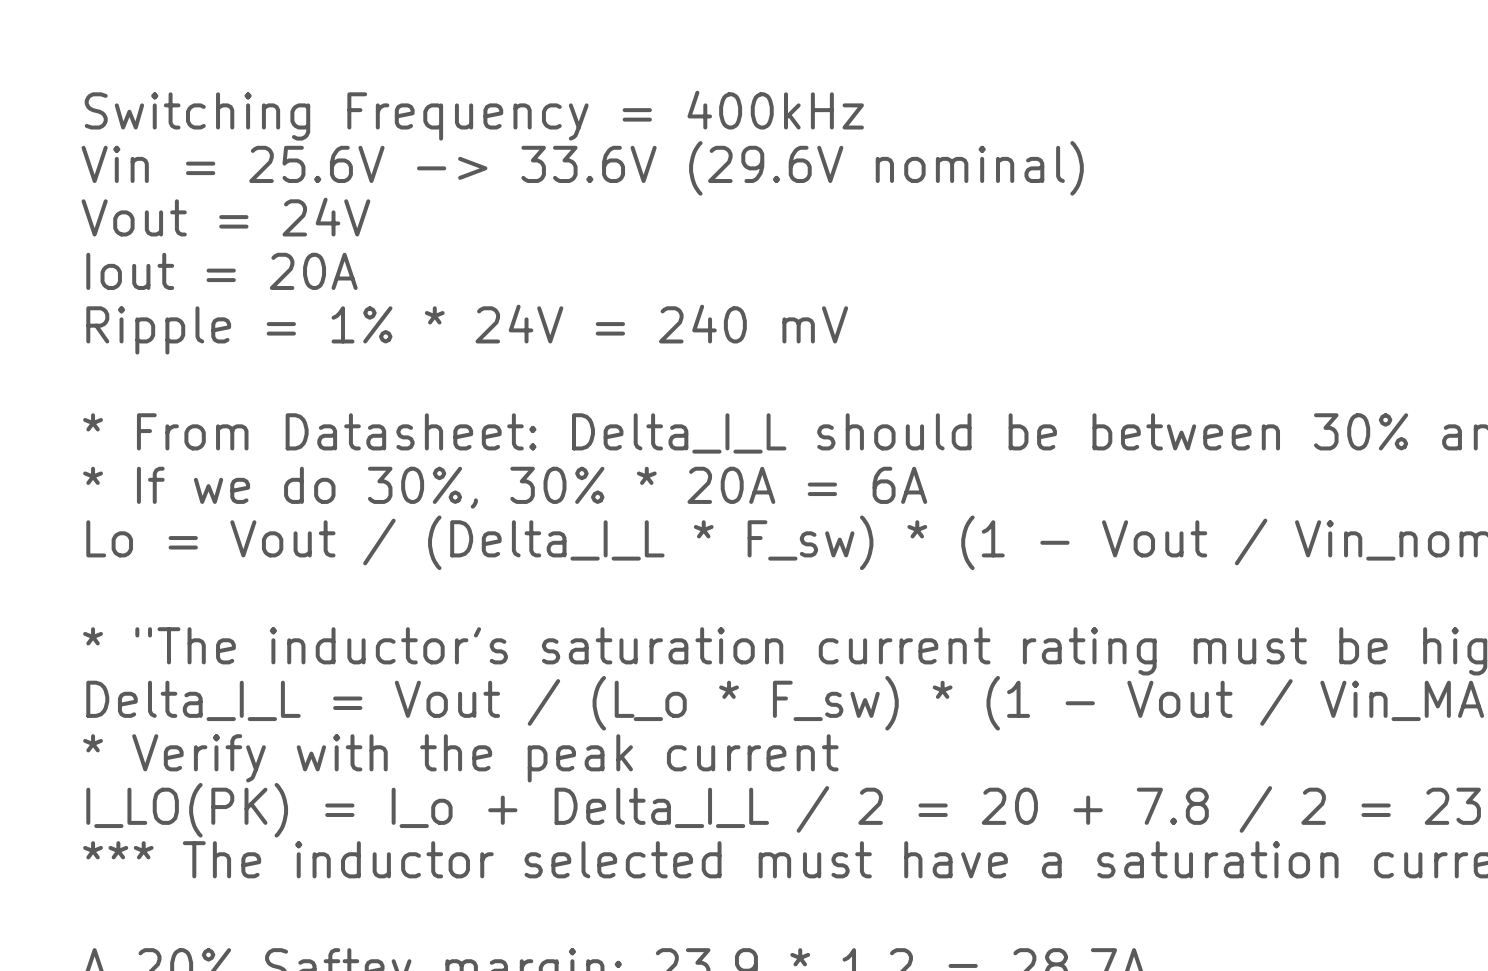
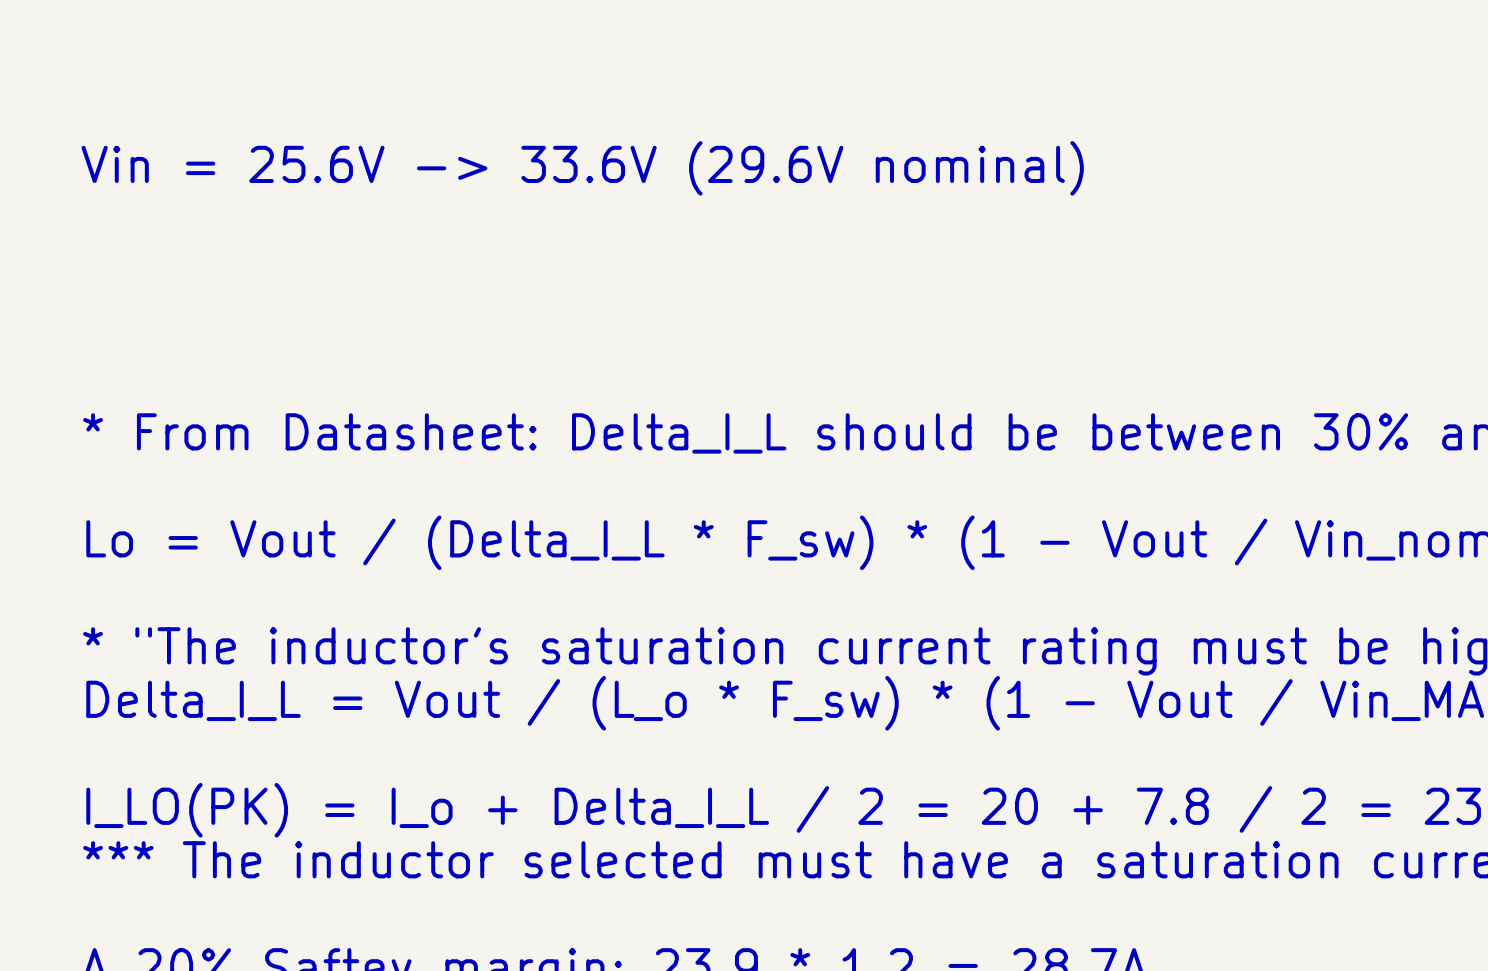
text: Switching Frequency = 400kHz (474, 115) -> none
text: Vout = 24V (225, 217) -> none
text: Iout = 20A (221, 271) -> none
text: Ripple = 1% * 24V = 240 mV (467, 329) -> none
text: * If we do 30%, 30% * 20A = 6A (505, 487) -> none
text: * Verify with the peak current (460, 758) -> none

